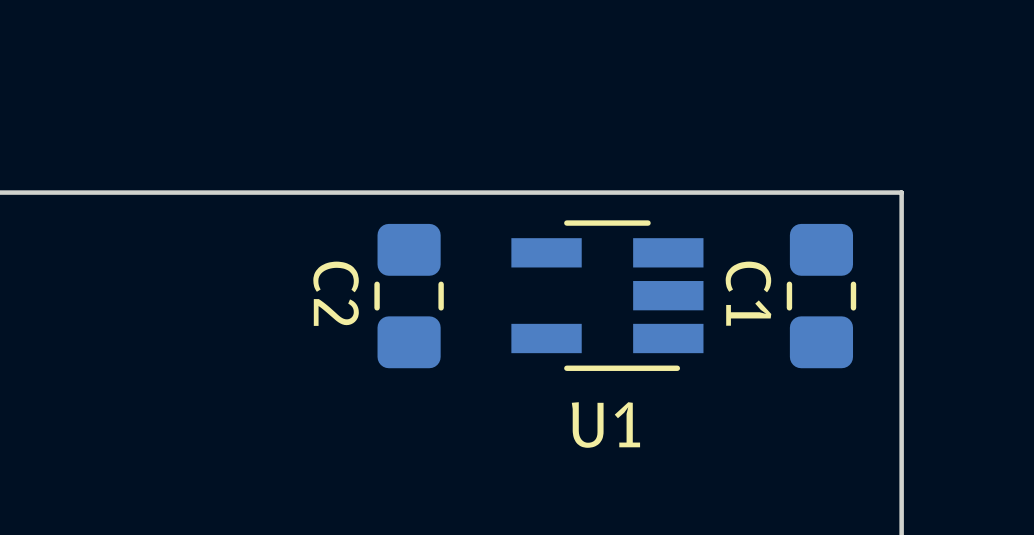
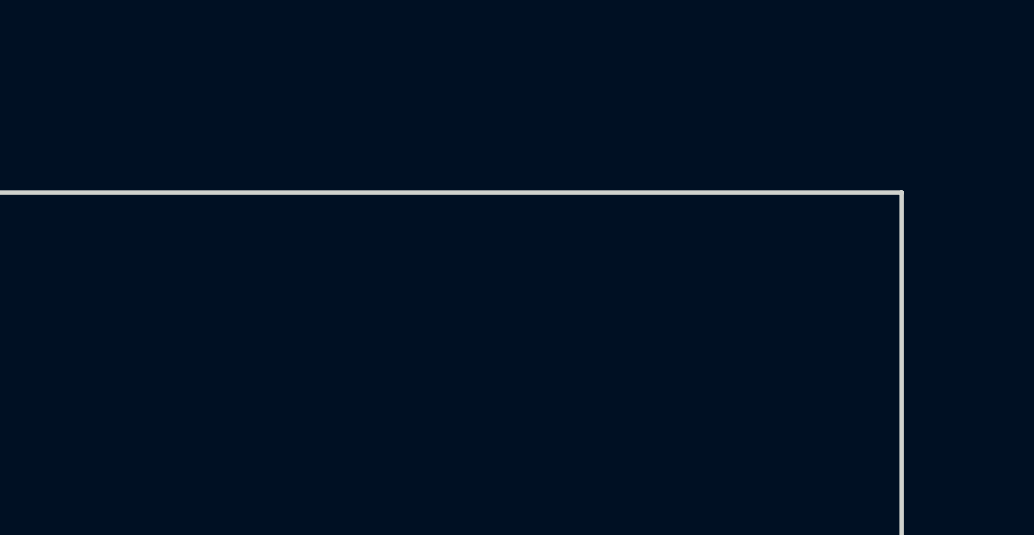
U1: (607, 295) -> none
C2: (409, 296) -> none
C1: (821, 296) -> none

